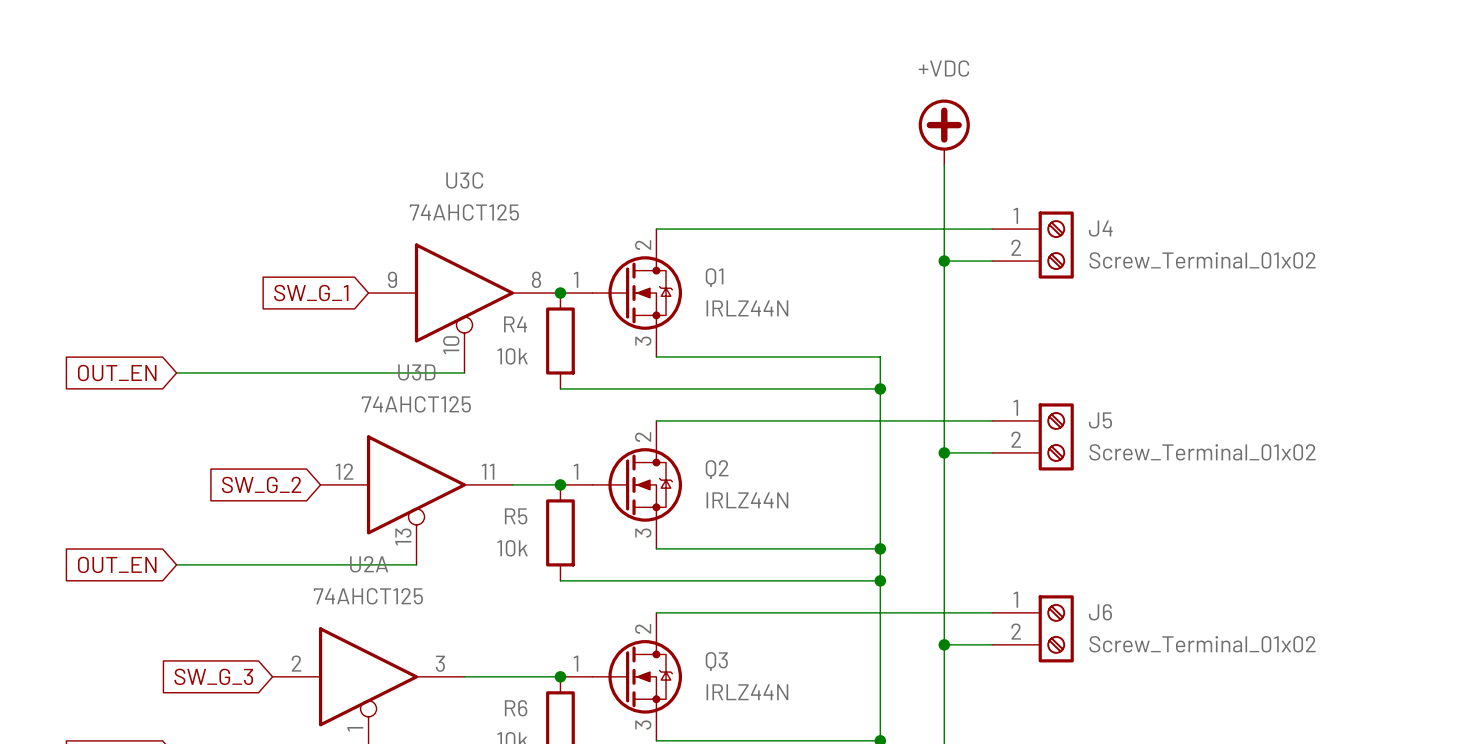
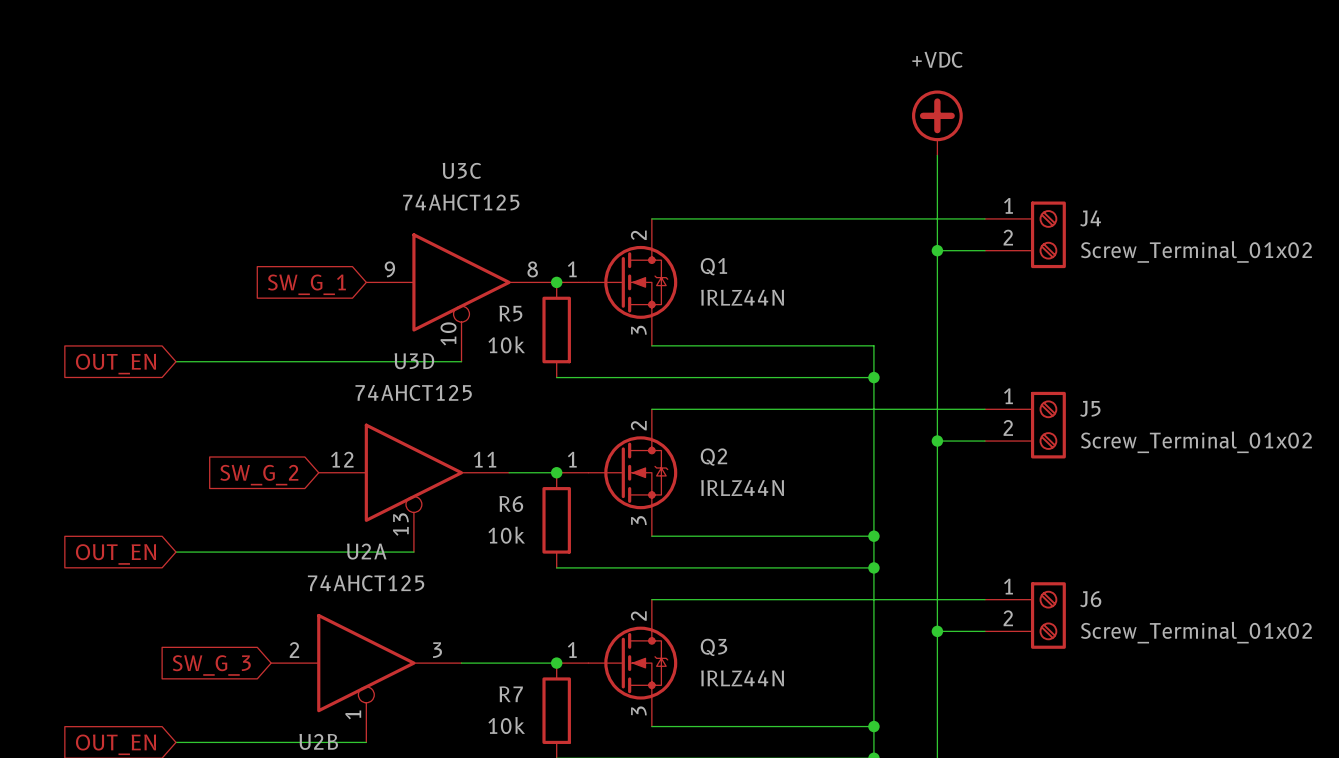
R4 name: R4 (515, 324) -> R5 (510, 313)
R5 name: R5 (516, 516) -> R6 (511, 503)
R6 name: R6 (516, 708) -> R7 (511, 694)

